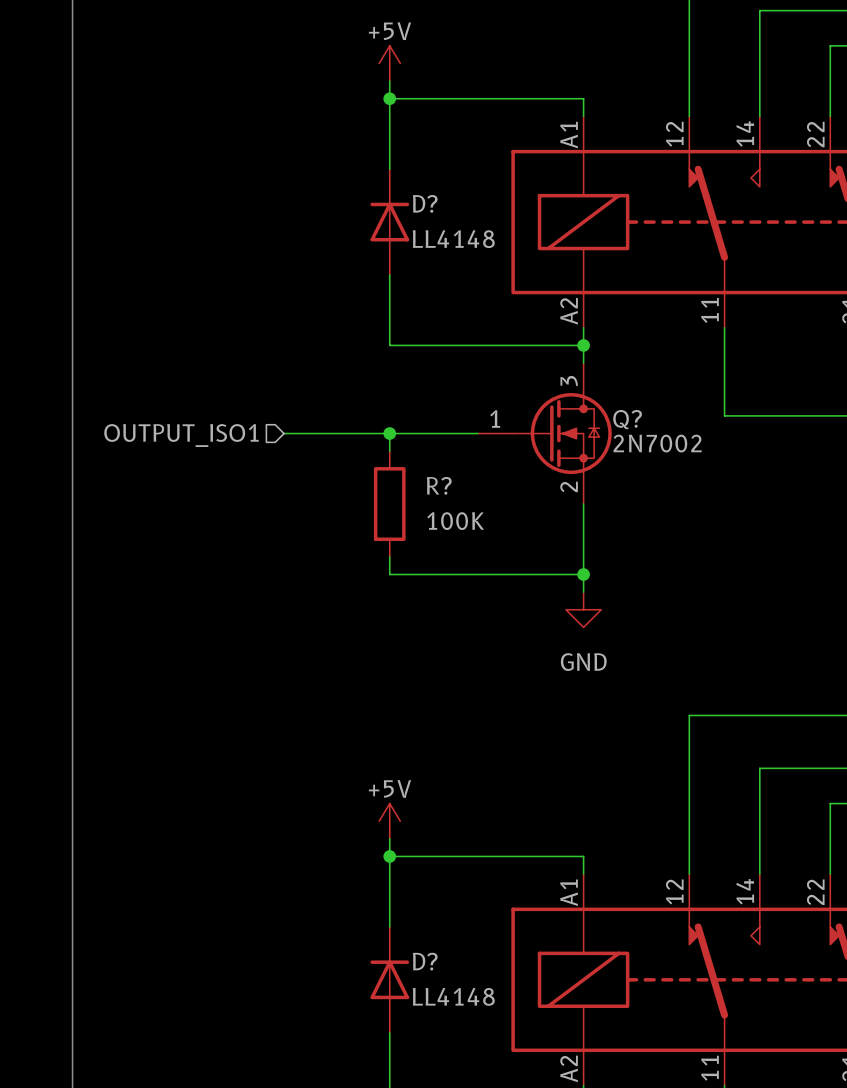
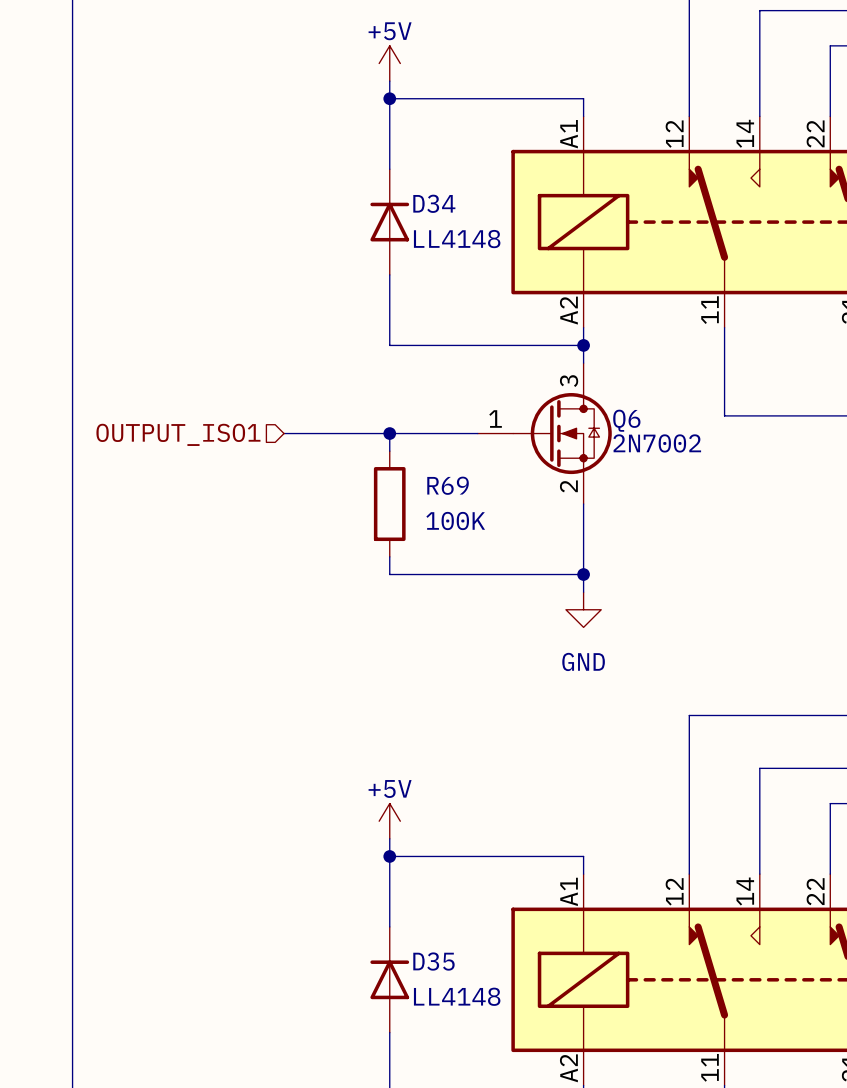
D? name: D? (425, 203) -> D34 (434, 203)
Q? name: Q? (627, 419) -> Q6 (626, 420)
R? name: R? (439, 485) -> R69 (448, 485)
D? name: D? (425, 961) -> D35 (433, 961)

